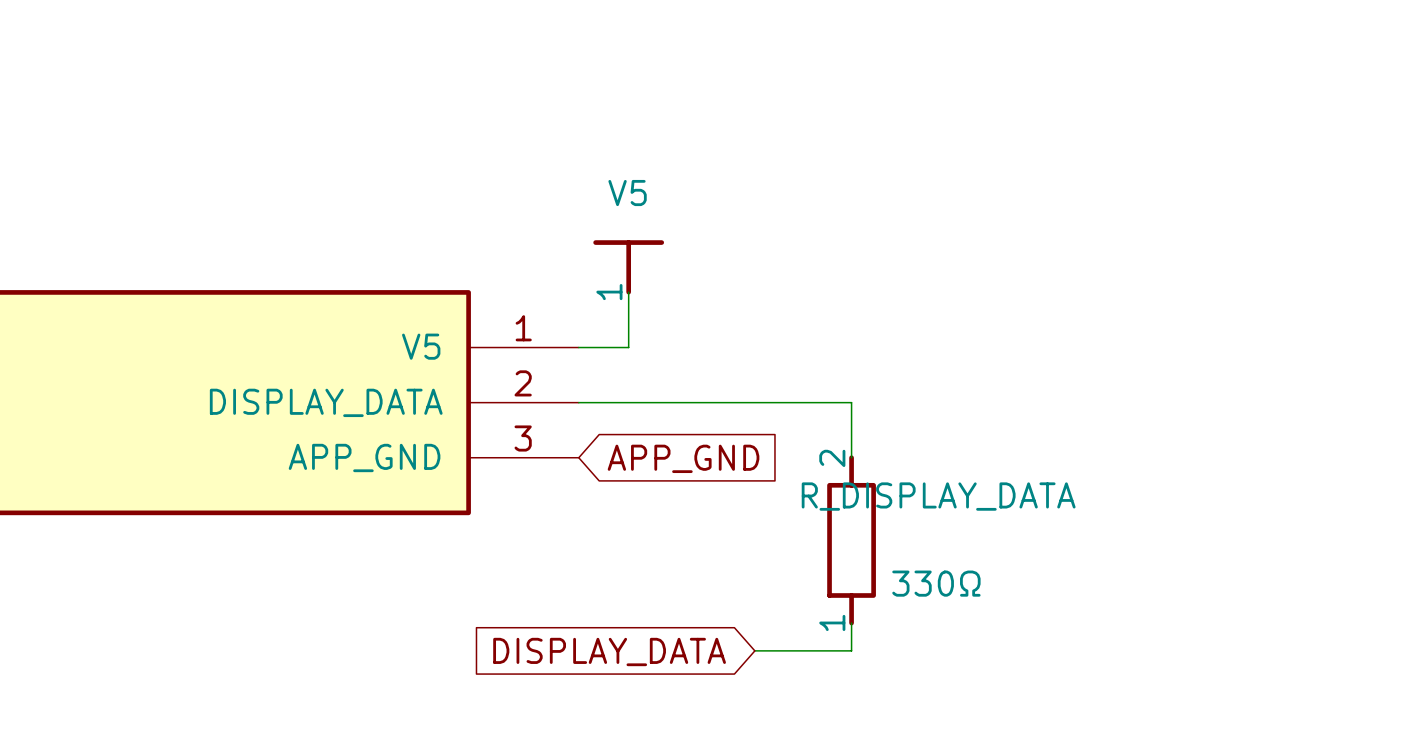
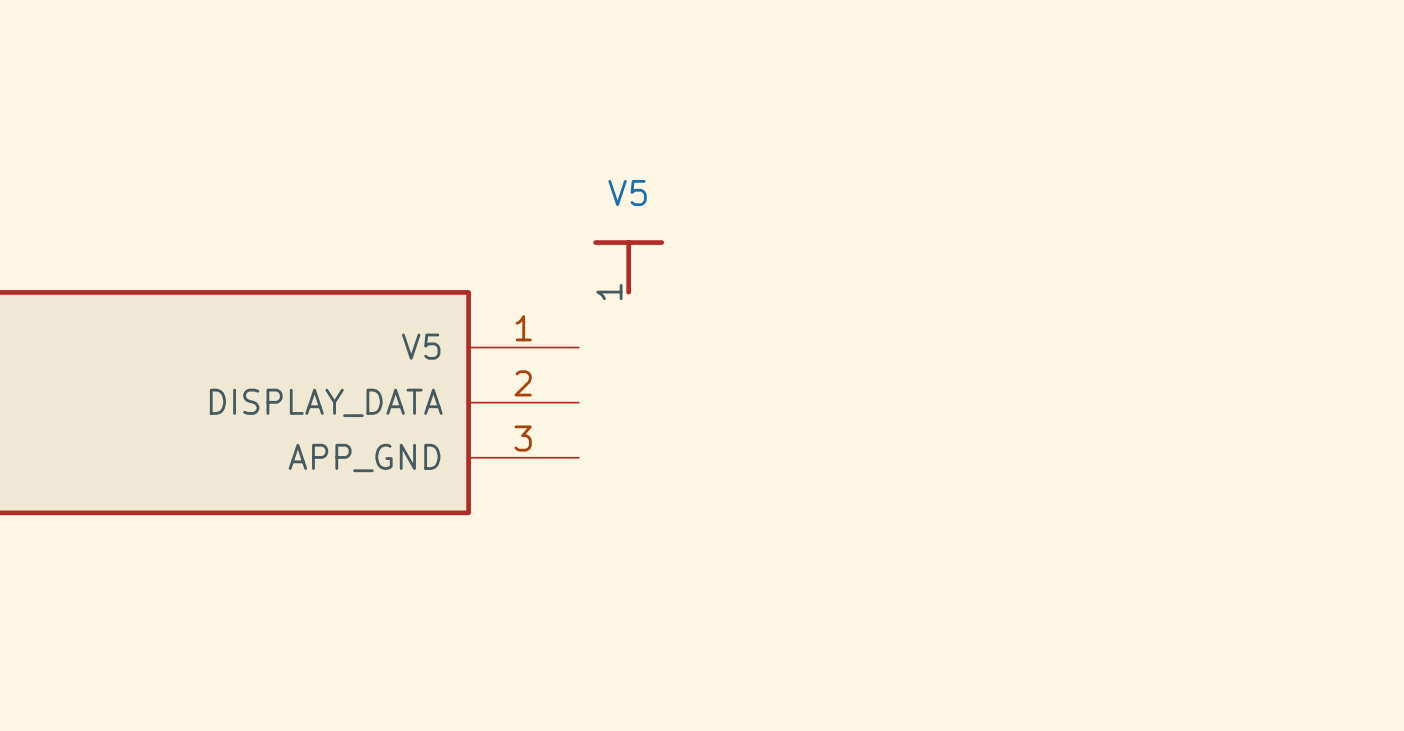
wire: (628, 292) (628, 347) (578, 347) -> none
wire: (578, 402) (851, 402) (851, 457) -> none
global label: APP_GND (683, 458) -> none
R_DISPLAY_DATA: 330Ω (851, 540) -> none
wire: (851, 623) (851, 650) (754, 650) -> none
global label: DISPLAY_DATA (609, 651) -> none

